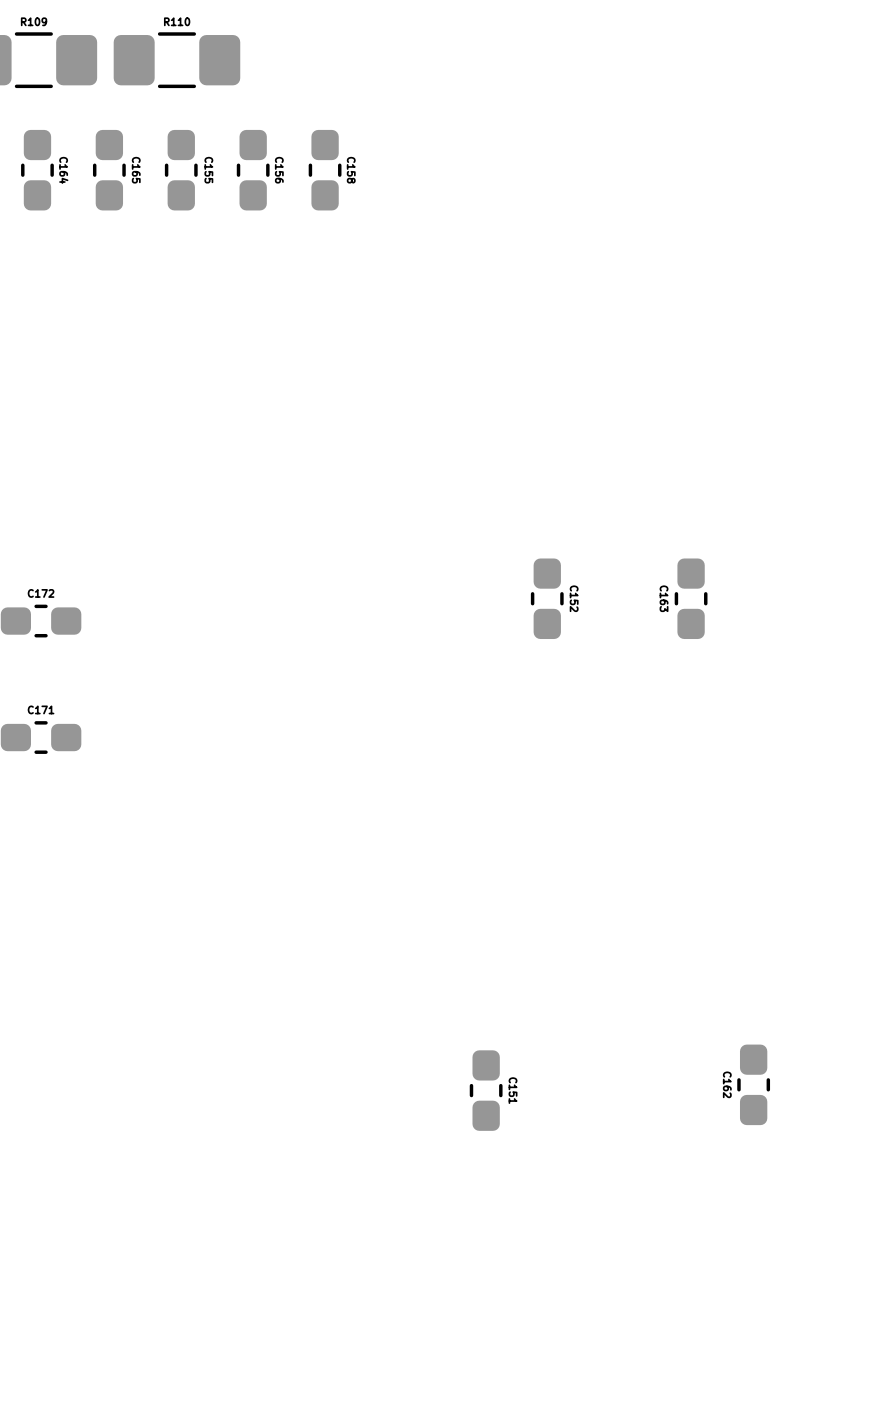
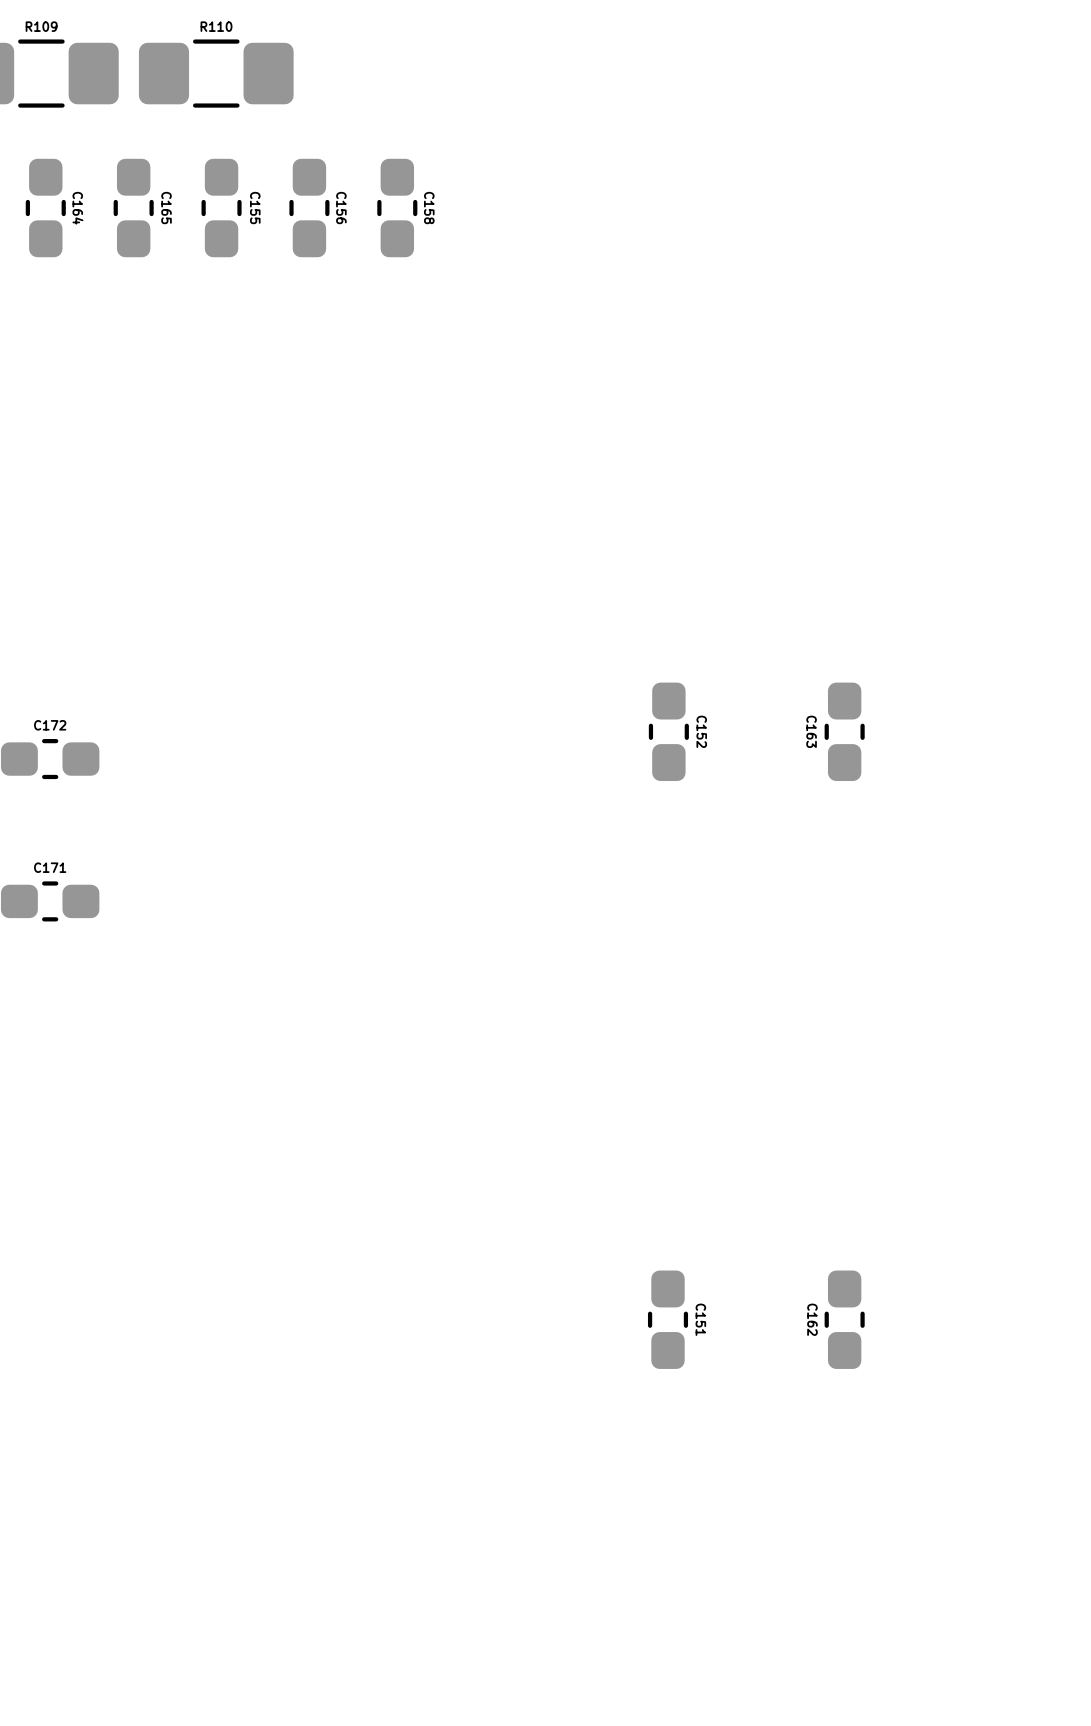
C162 position: (753, 1084) -> (844, 1319)
C151 position: (486, 1090) -> (668, 1319)

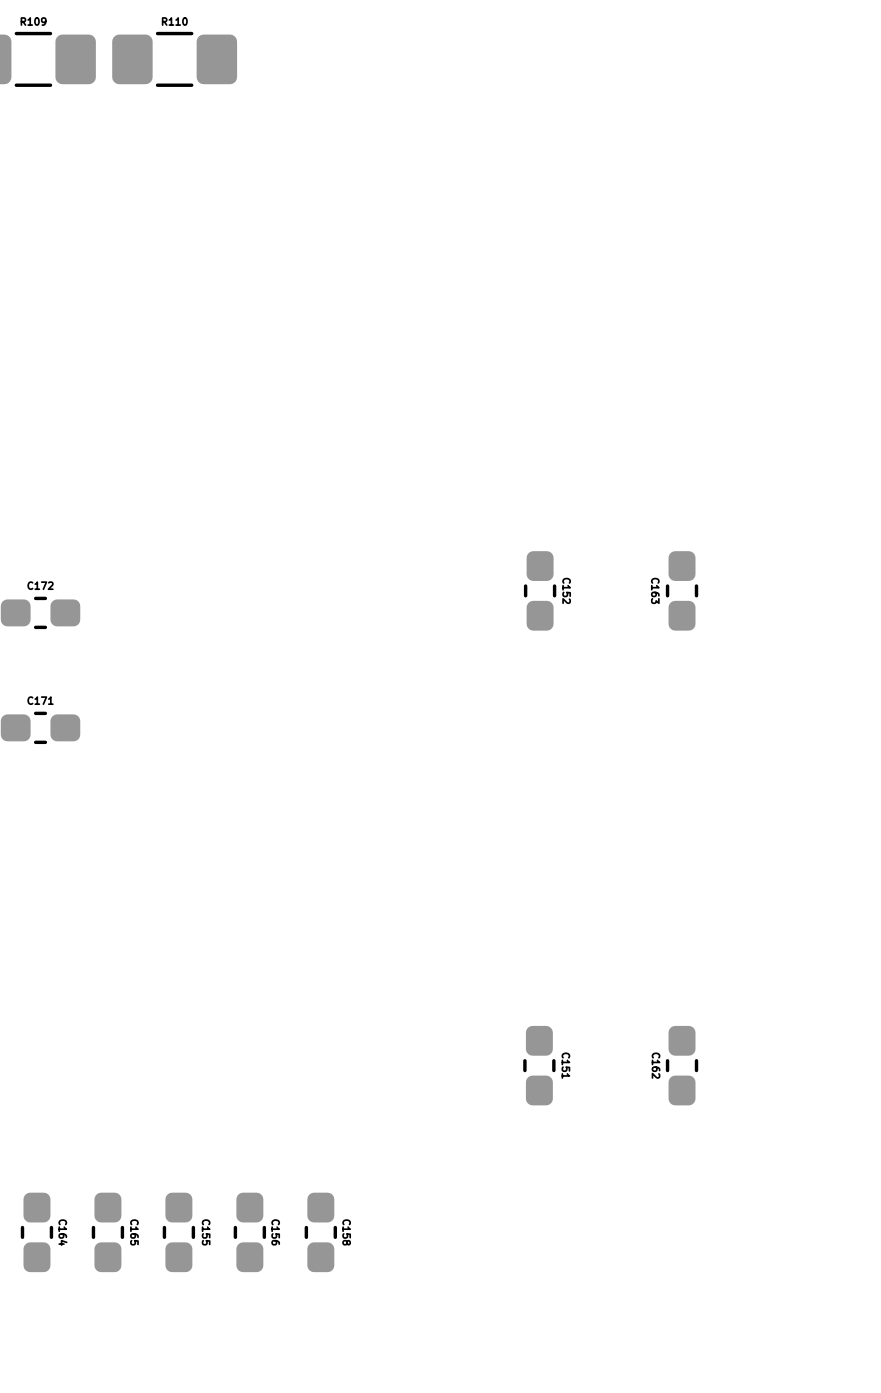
C164 position: (45, 208) -> (36, 1232)
C165 position: (133, 208) -> (107, 1232)
C155 position: (221, 208) -> (178, 1232)
C156 position: (309, 208) -> (249, 1232)
C158 position: (397, 208) -> (320, 1232)

